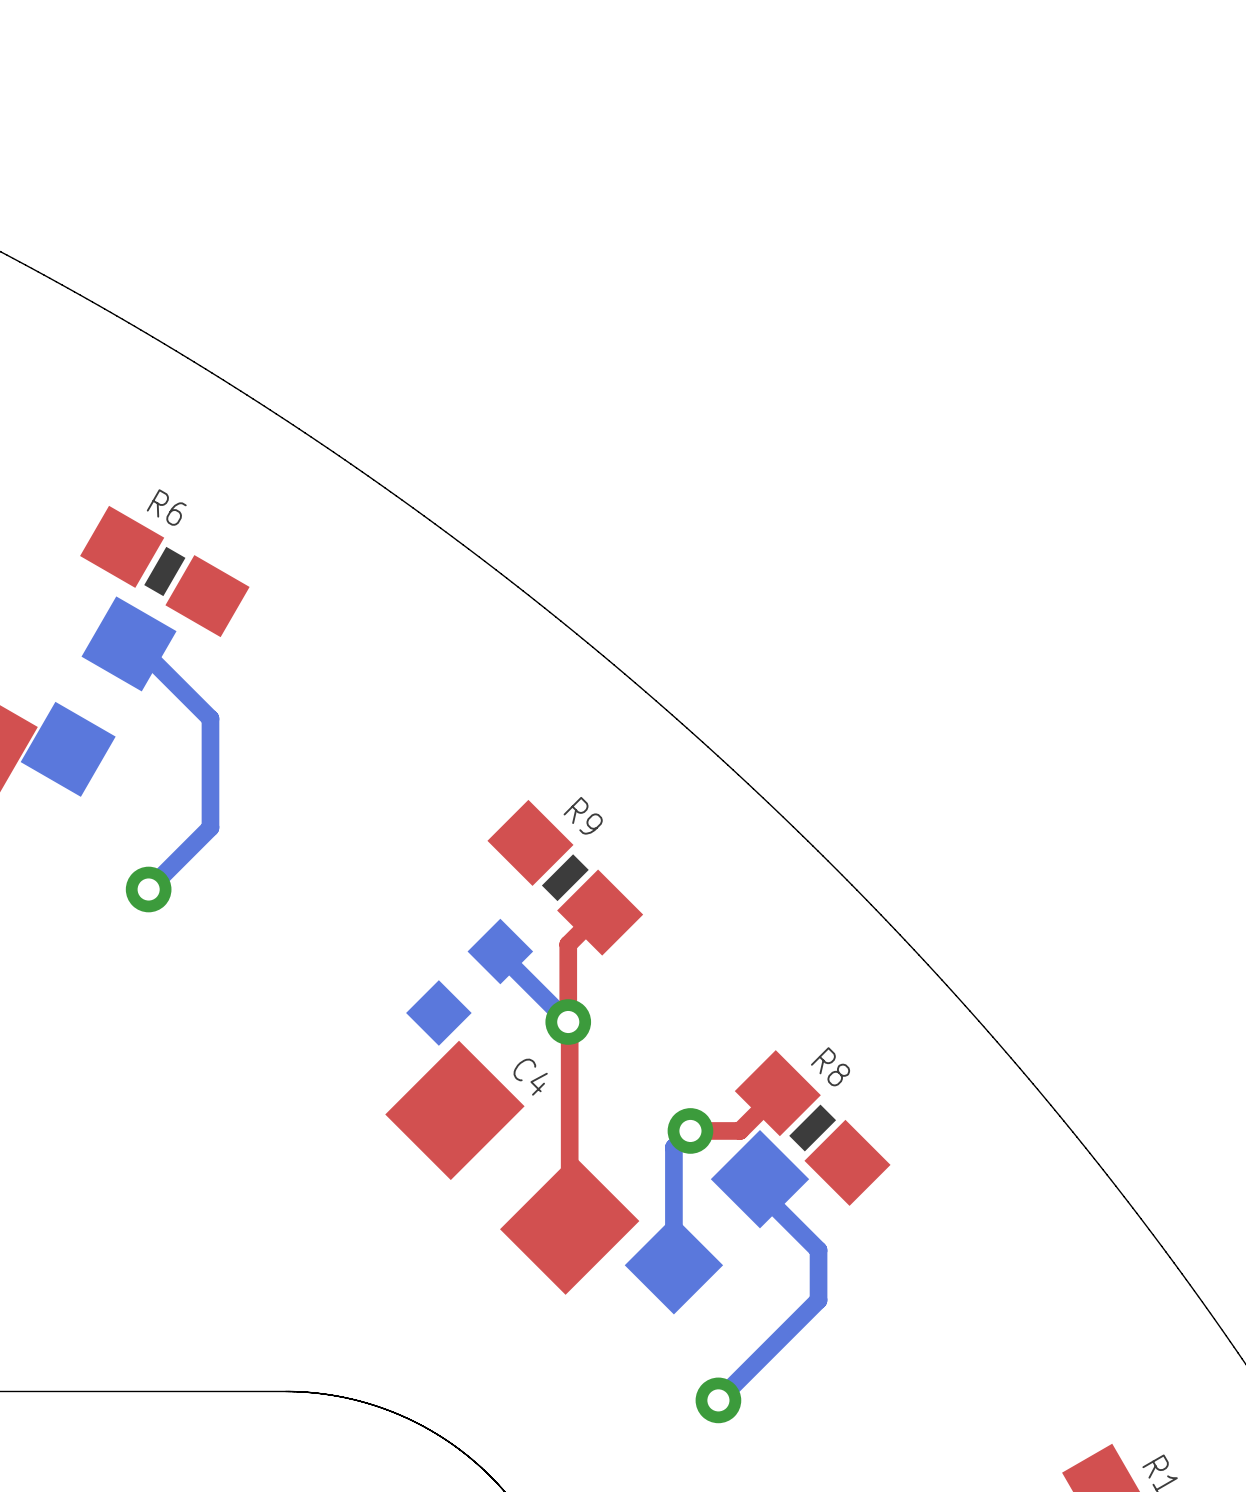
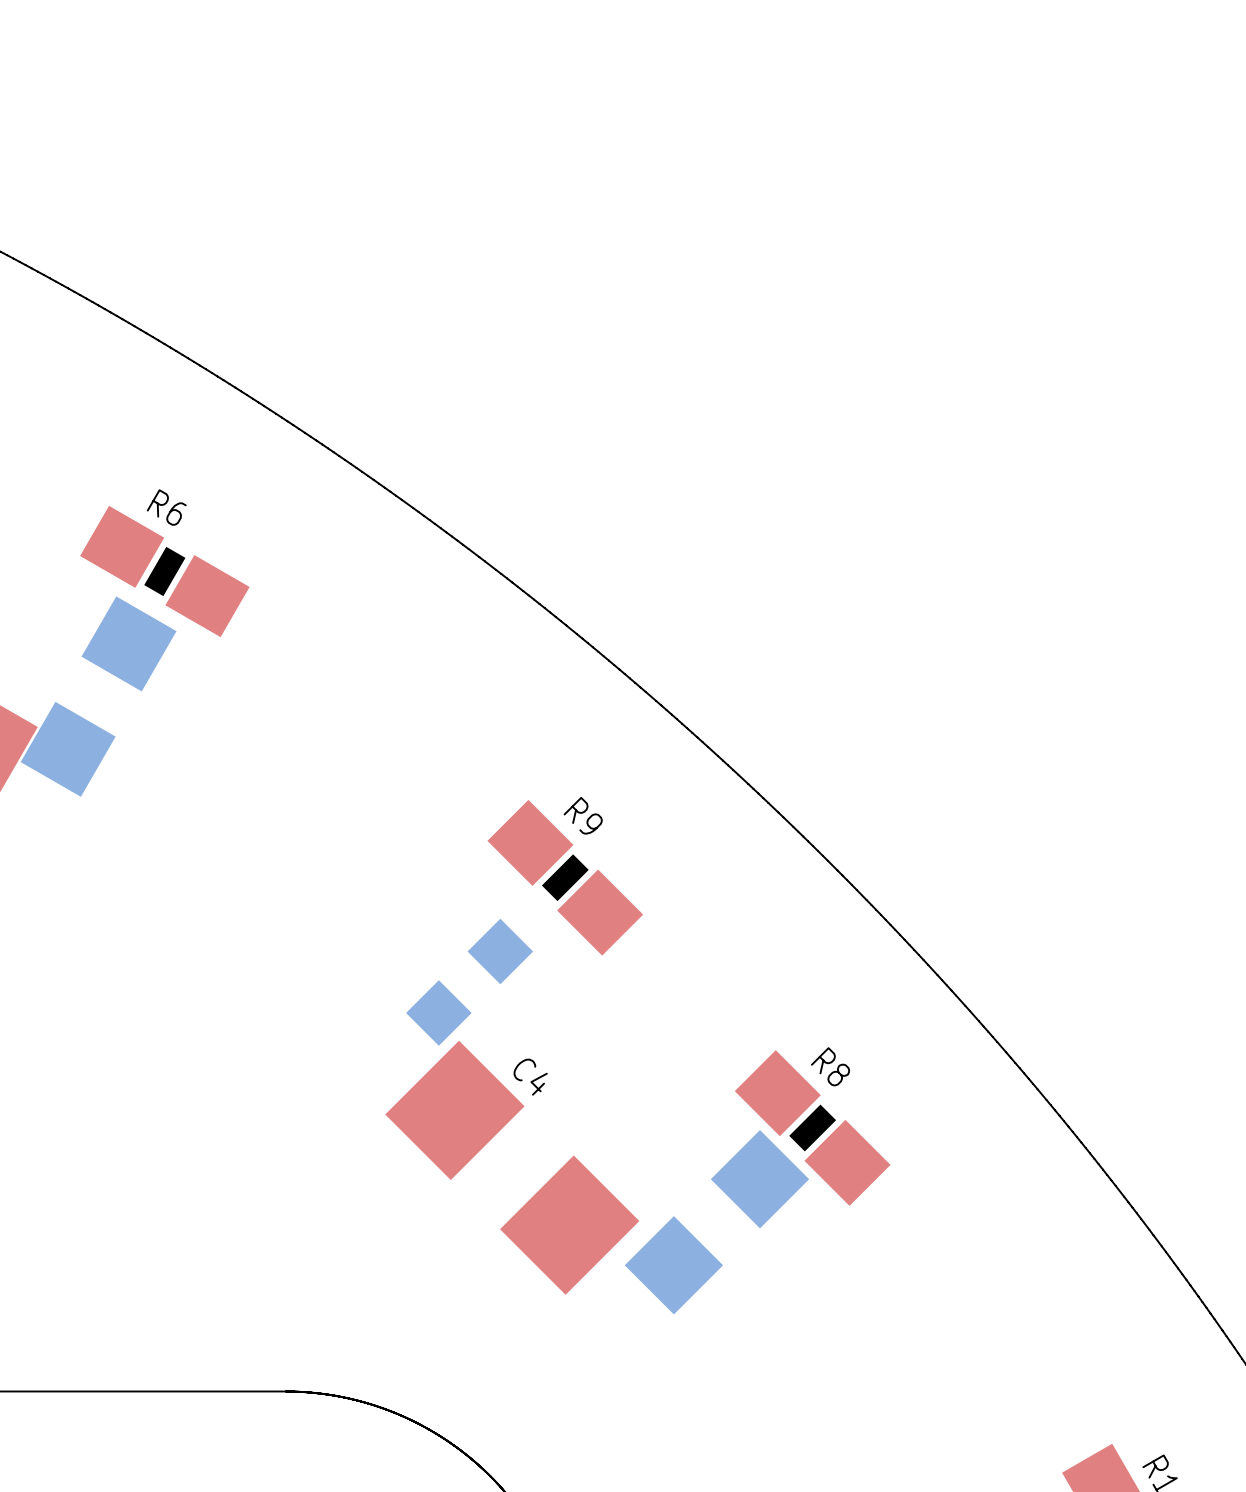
bottom track: (129, 643) (135, 643) (210, 718) (210, 827) (148, 889) -> none
via: (148, 889) -> none
top track: (600, 912) (568, 944) (569, 1225) -> none
bottom track: (500, 951) (500, 954) (568, 1022) -> none
via: (568, 1022) -> none
top track: (777, 1093) (740, 1130) (690, 1130) -> none
bottom track: (690, 1130) (673, 1147) (673, 1265) -> none
via: (690, 1130) -> none
bottom track: (759, 1179) (759, 1191) (818, 1250) (818, 1300) (718, 1400) -> none
via: (718, 1400) -> none

